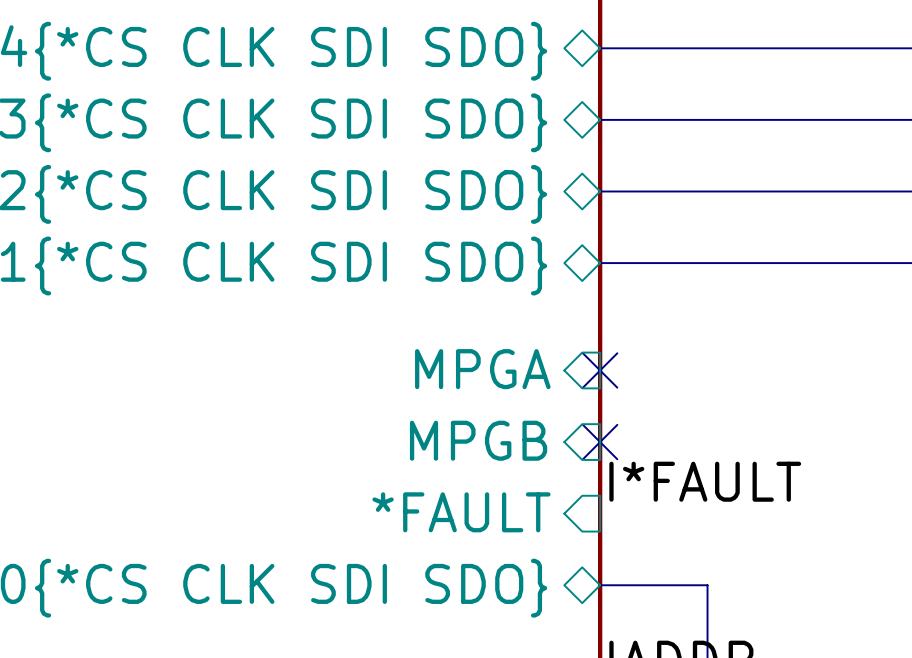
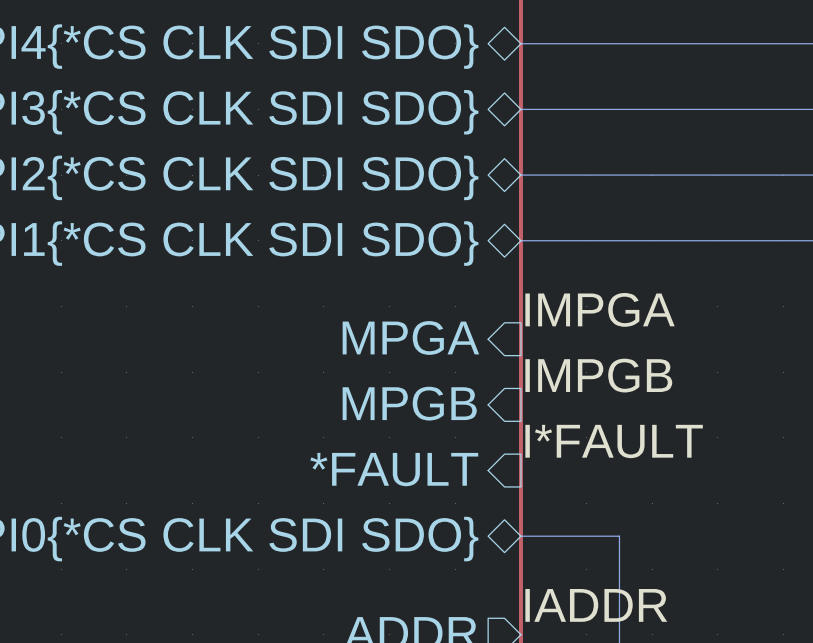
label: none -> IMPGA (600, 309)
no-connect mark: (600, 370) -> none
label: none -> IMPGB (598, 375)
no-connect mark: (600, 442) -> none

